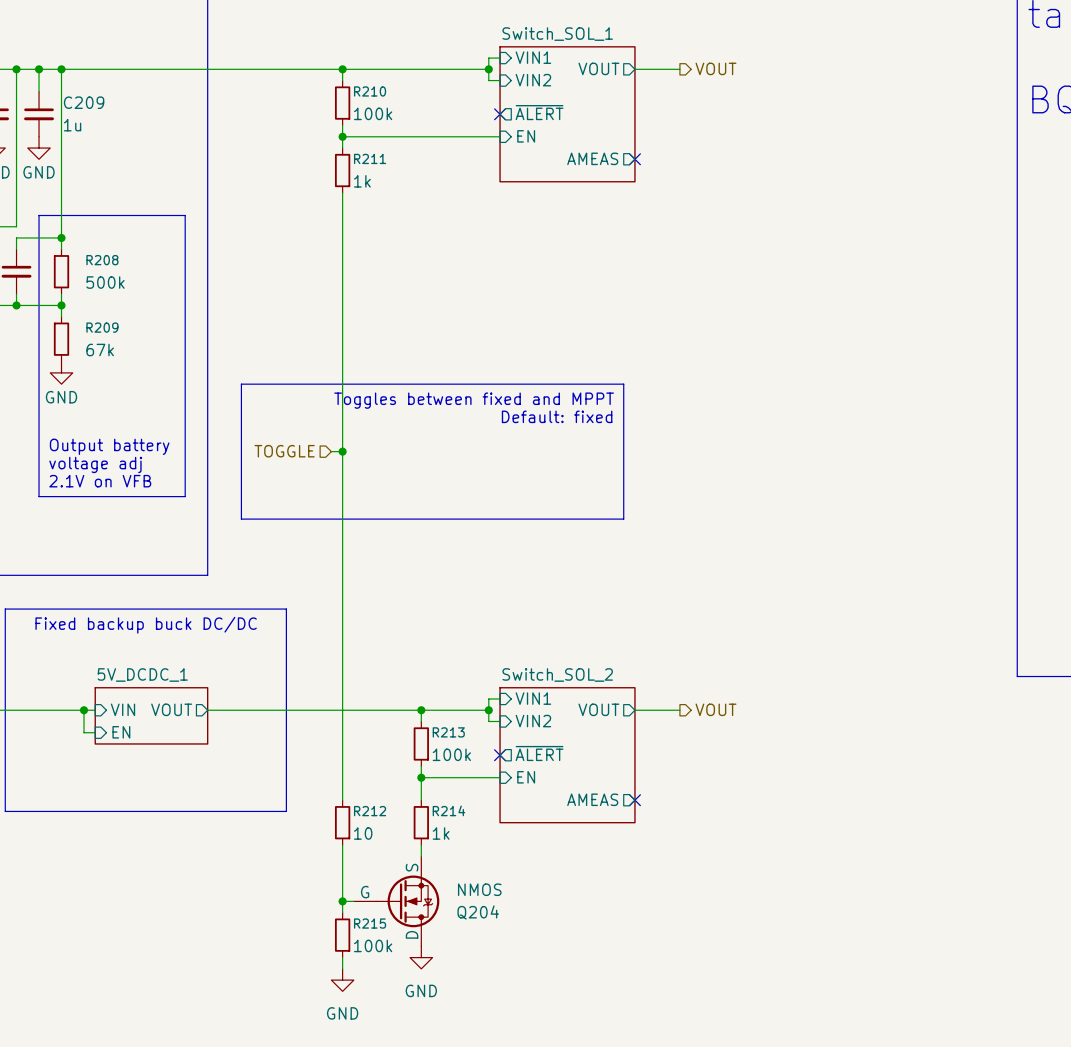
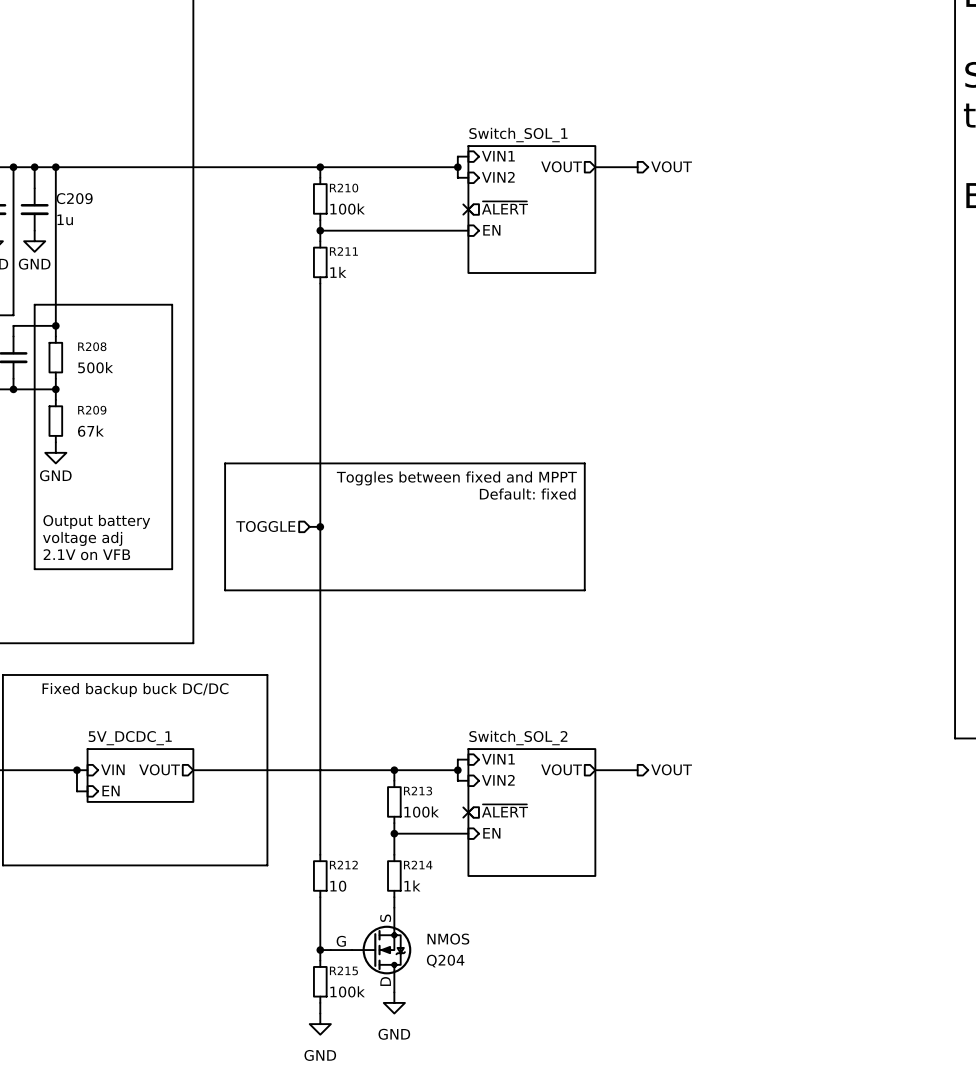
sheet pin: AMEAS (592, 158) -> none
no-connect mark: (634, 159) -> none
sheet pin: AMEAS (592, 799) -> none
no-connect mark: (634, 800) -> none

